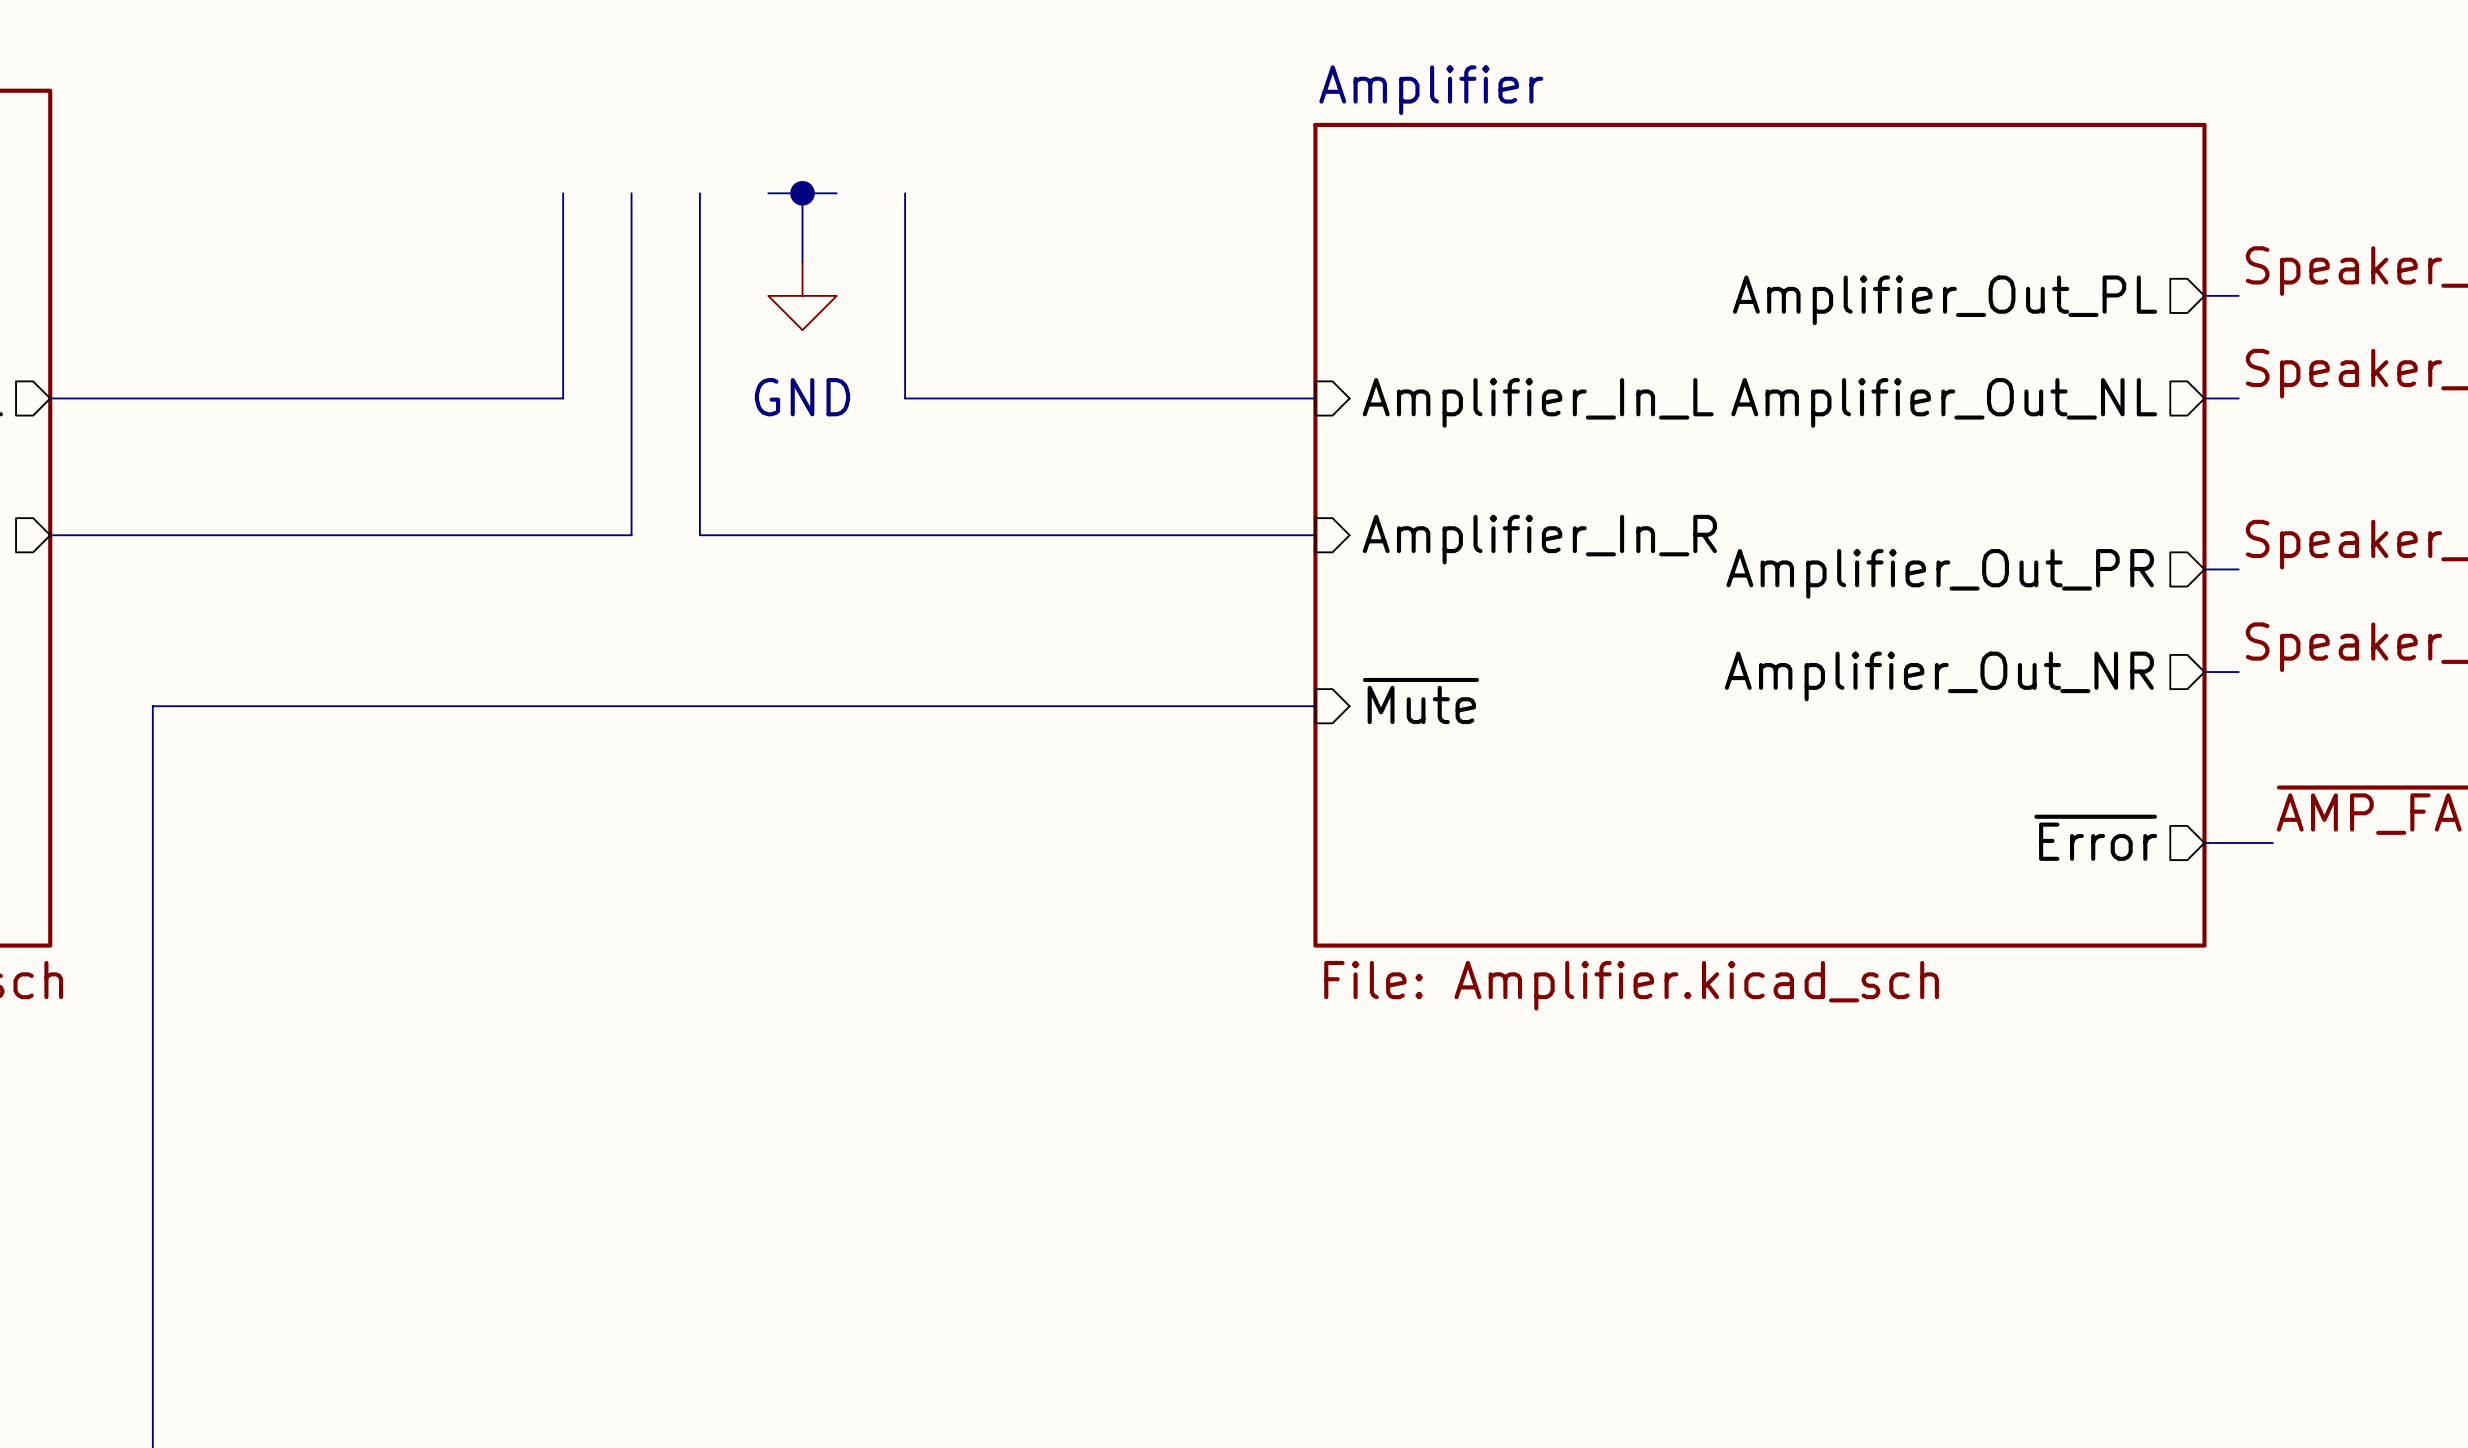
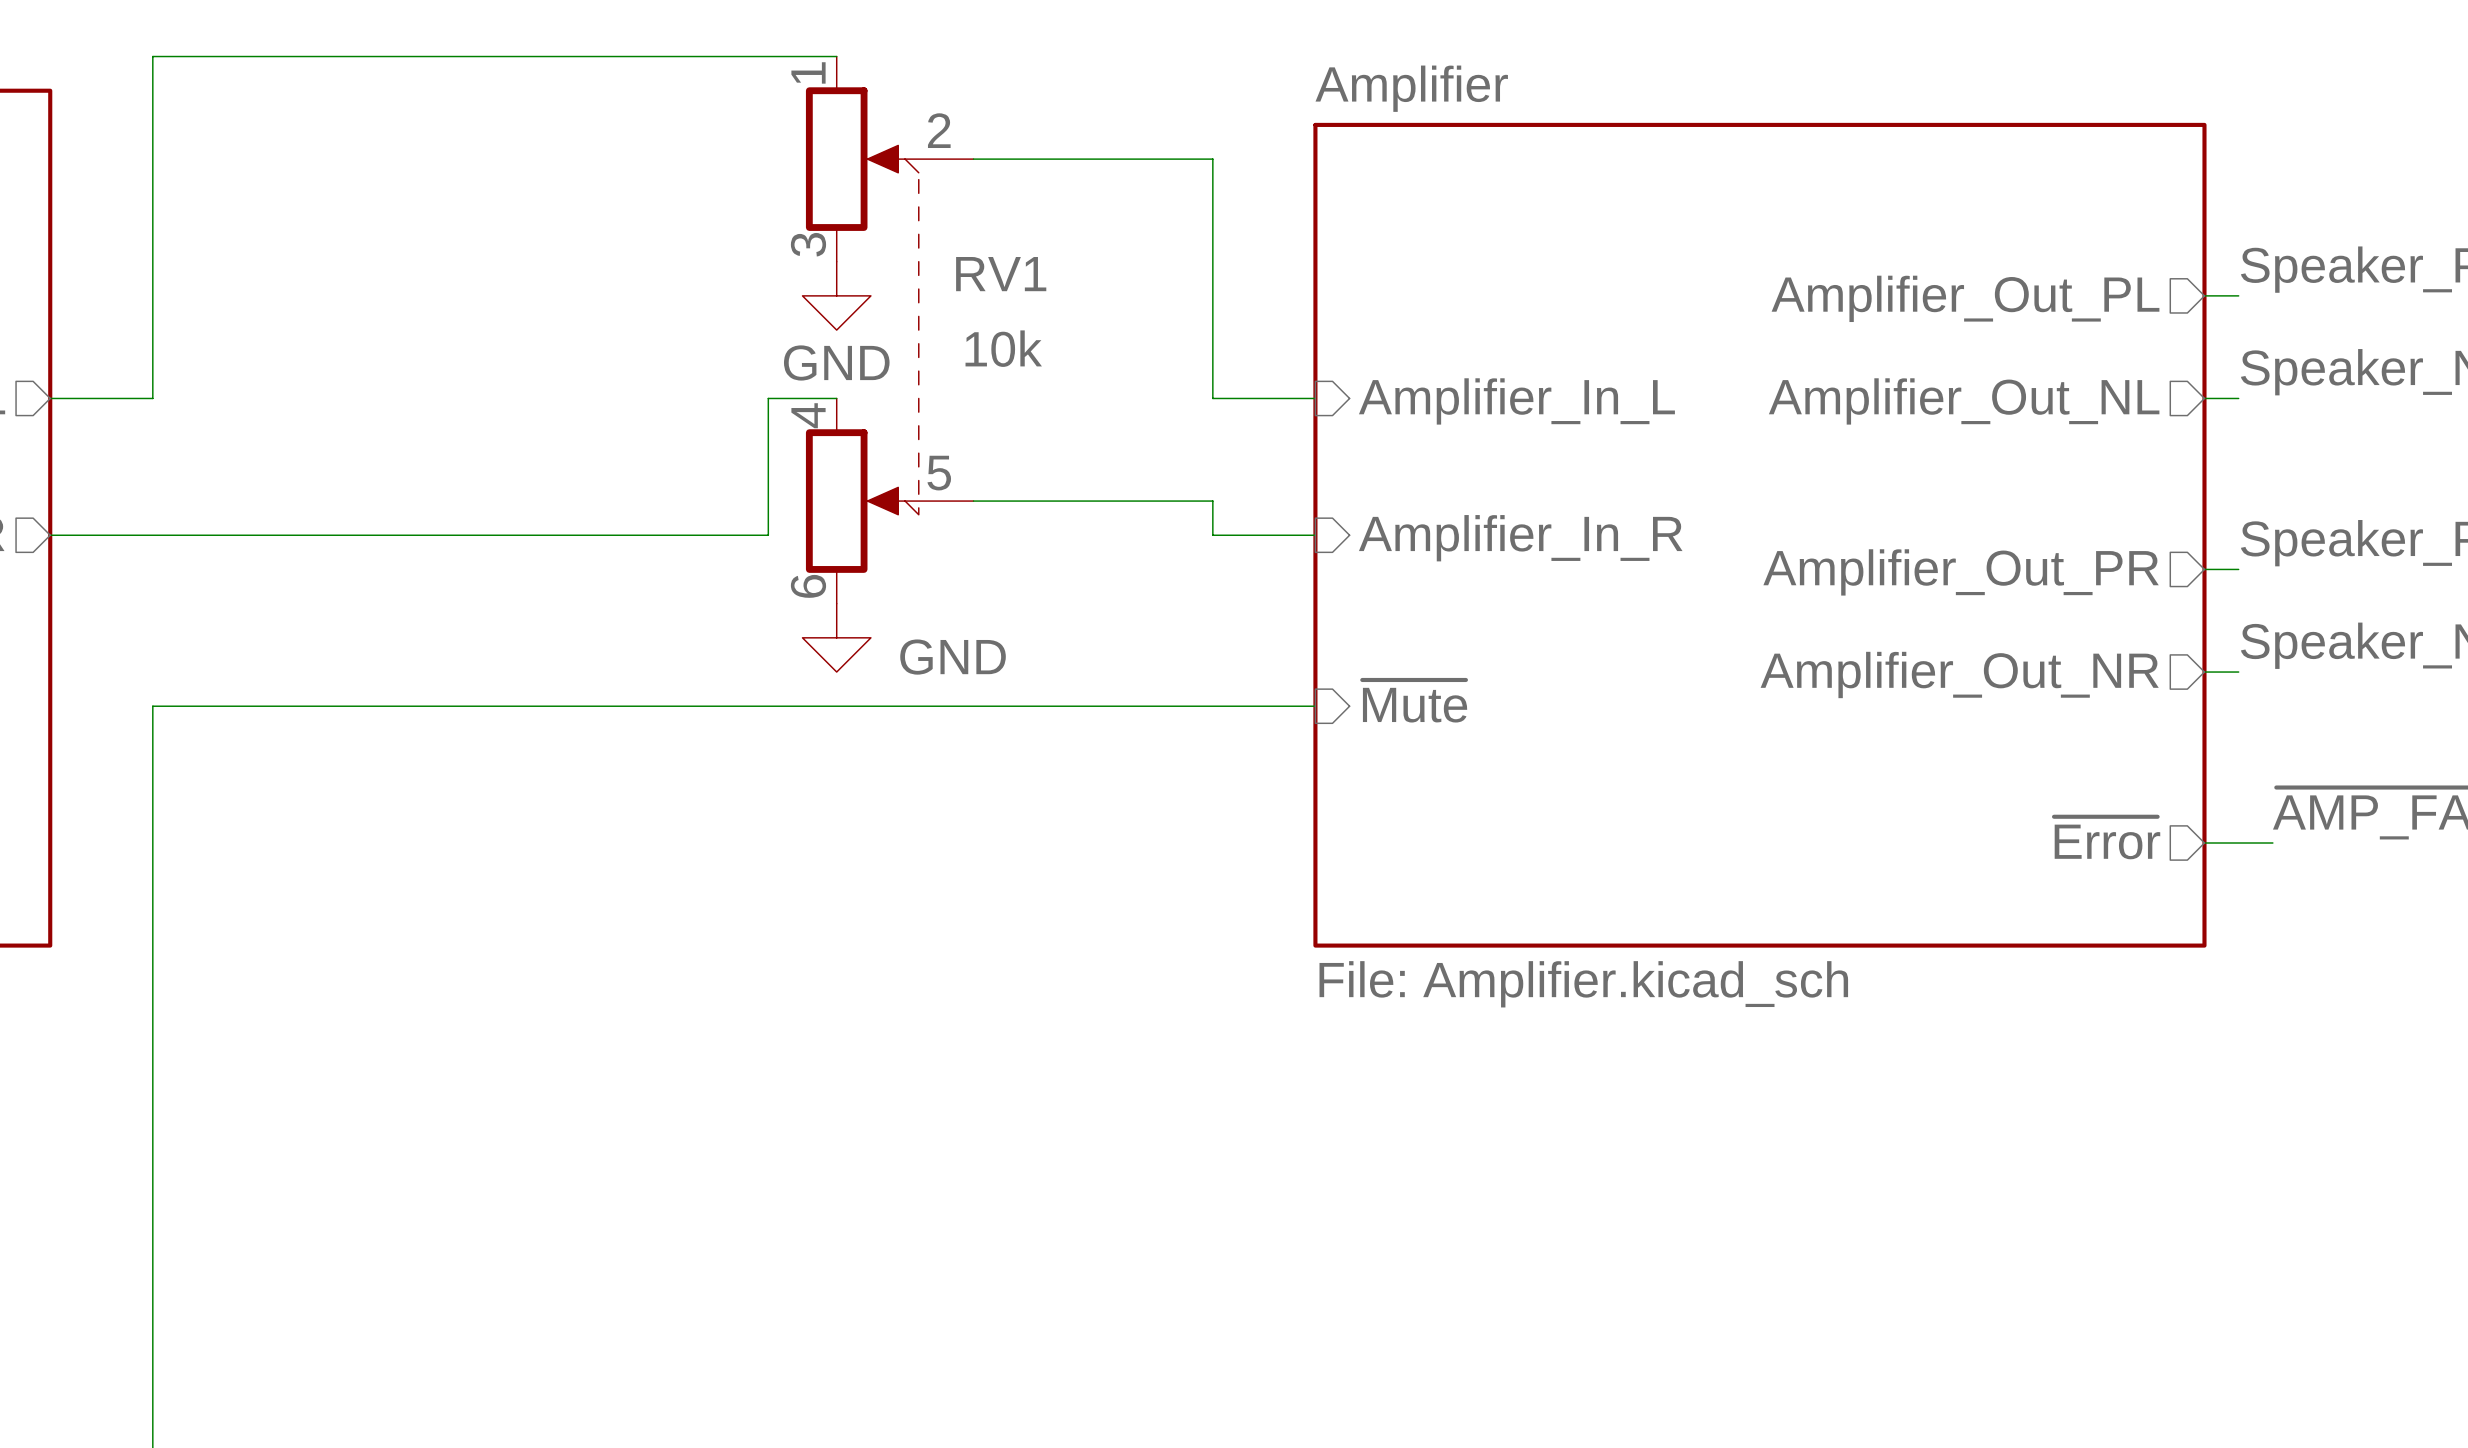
wire: (563, 193) (563, 398) (152, 398) -> (836, 56) (152, 56) (152, 398)
wire: (631, 193) (631, 535) -> (699, 535) (631, 535)
wire: (699, 193) (699, 535) -> none
wire: (768, 193) (836, 193) -> none
wire: (802, 193) (802, 261) -> none
junction: (802, 193) -> none
wire: (905, 193) (905, 398) (1212, 398) -> (973, 159) (1212, 159) (1212, 398)
power symbol position: GND (802, 295) -> GND (836, 295)
RV1: none -> 10k (889, 330)
power symbol text position: GND (802, 397) -> GND (836, 362)
wire: none -> (836, 398) (768, 398) (768, 535)
wire: (768, 535) (1212, 535) -> (973, 501) (1212, 501) (1212, 535)
power symbol: none -> GND (836, 637)

